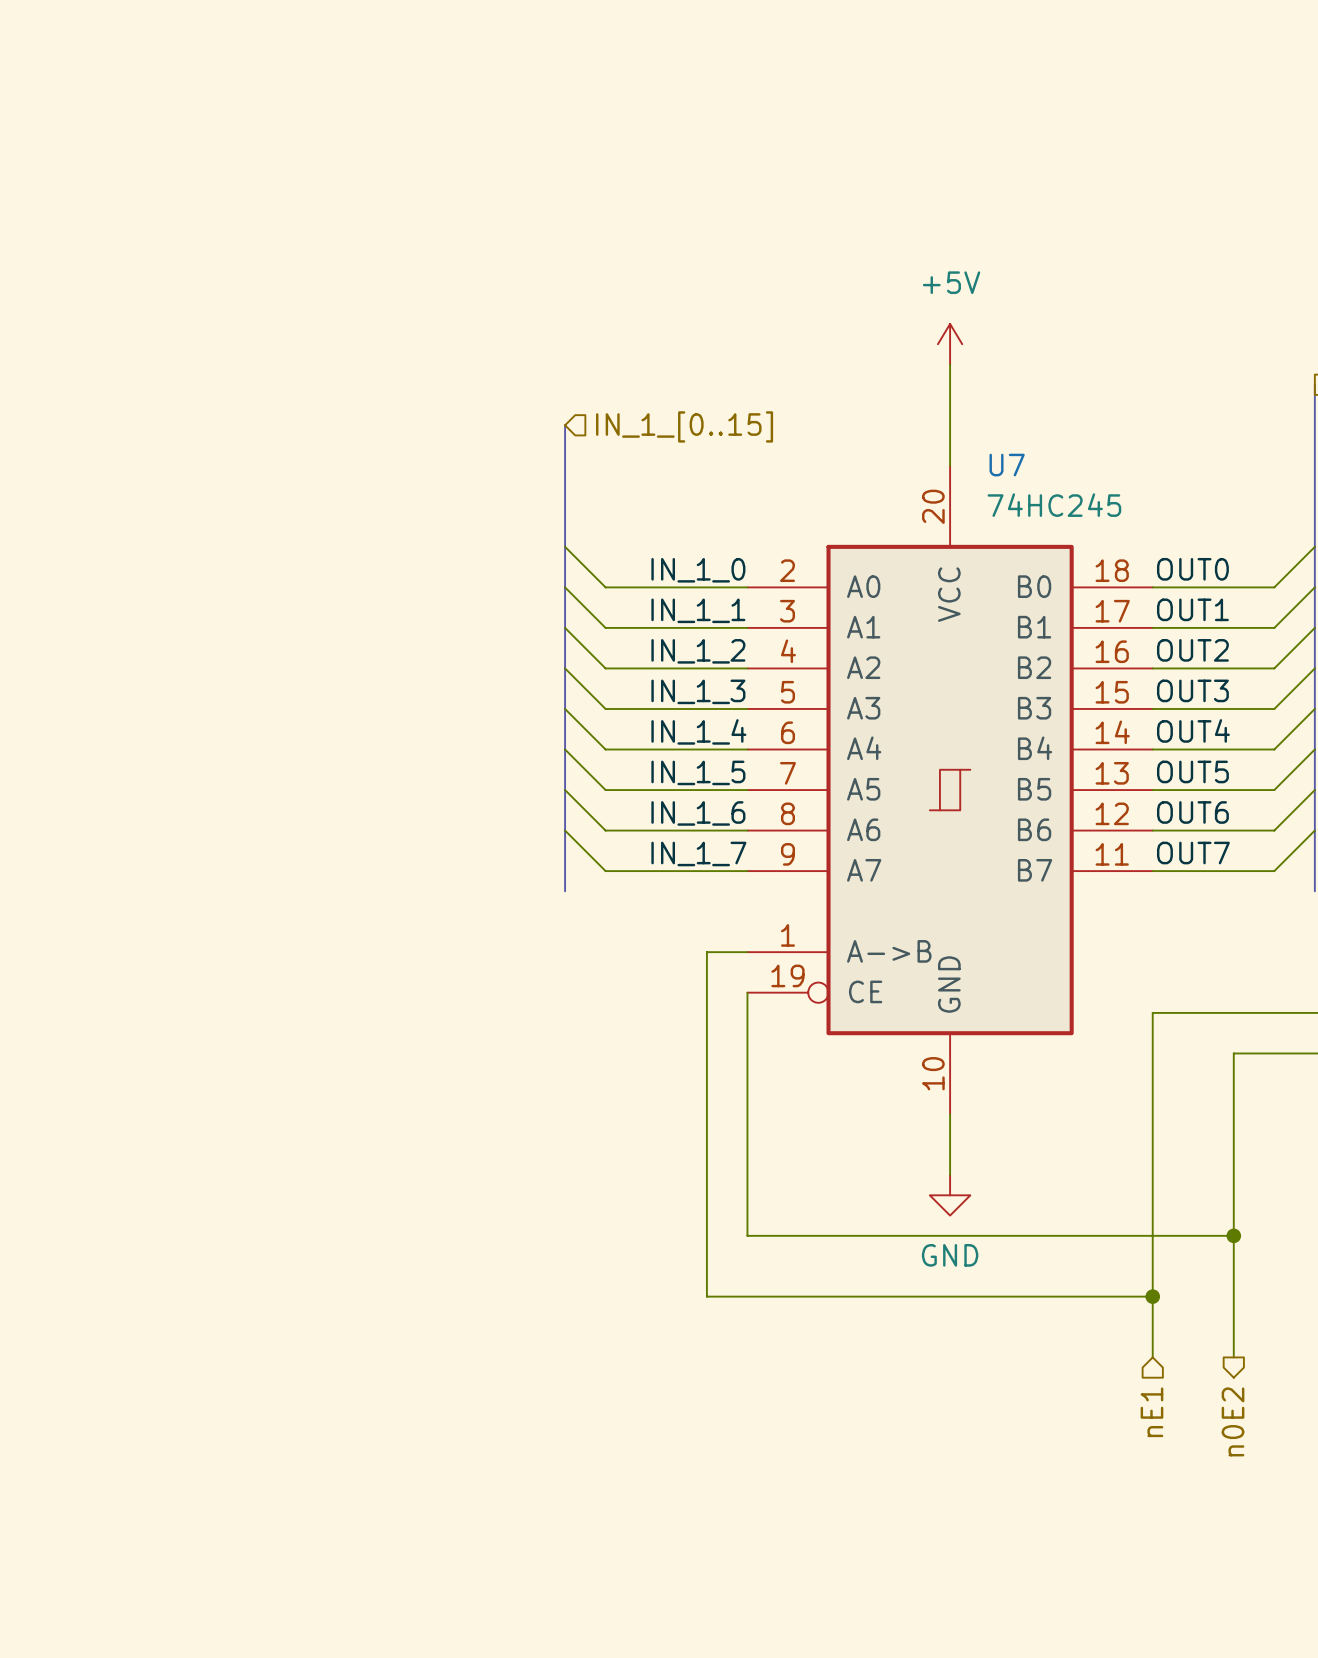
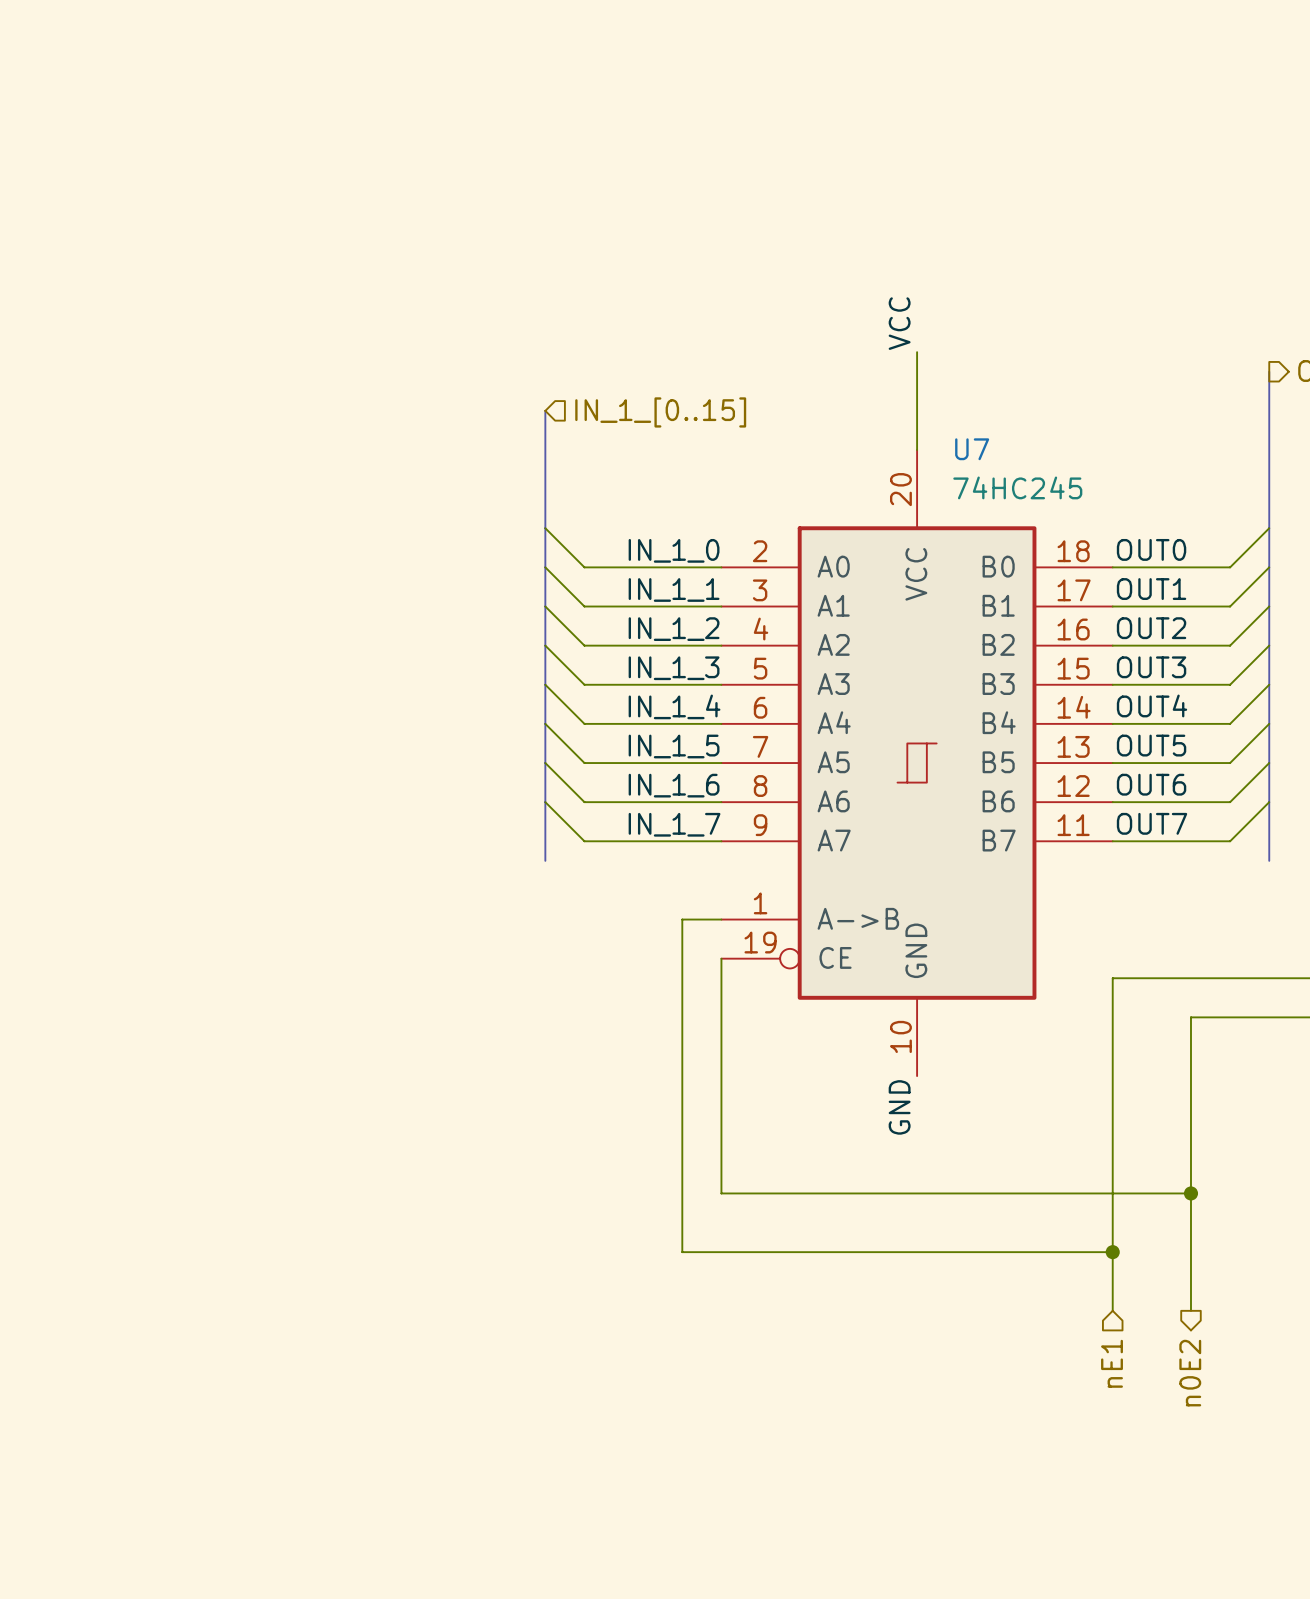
label: none -> VCC (899, 323)
power symbol: +5V (950, 344) -> none
wire: (950, 1114) (950, 1175) -> none
label: none -> GND (899, 1107)
power symbol: GND (950, 1195) -> none

